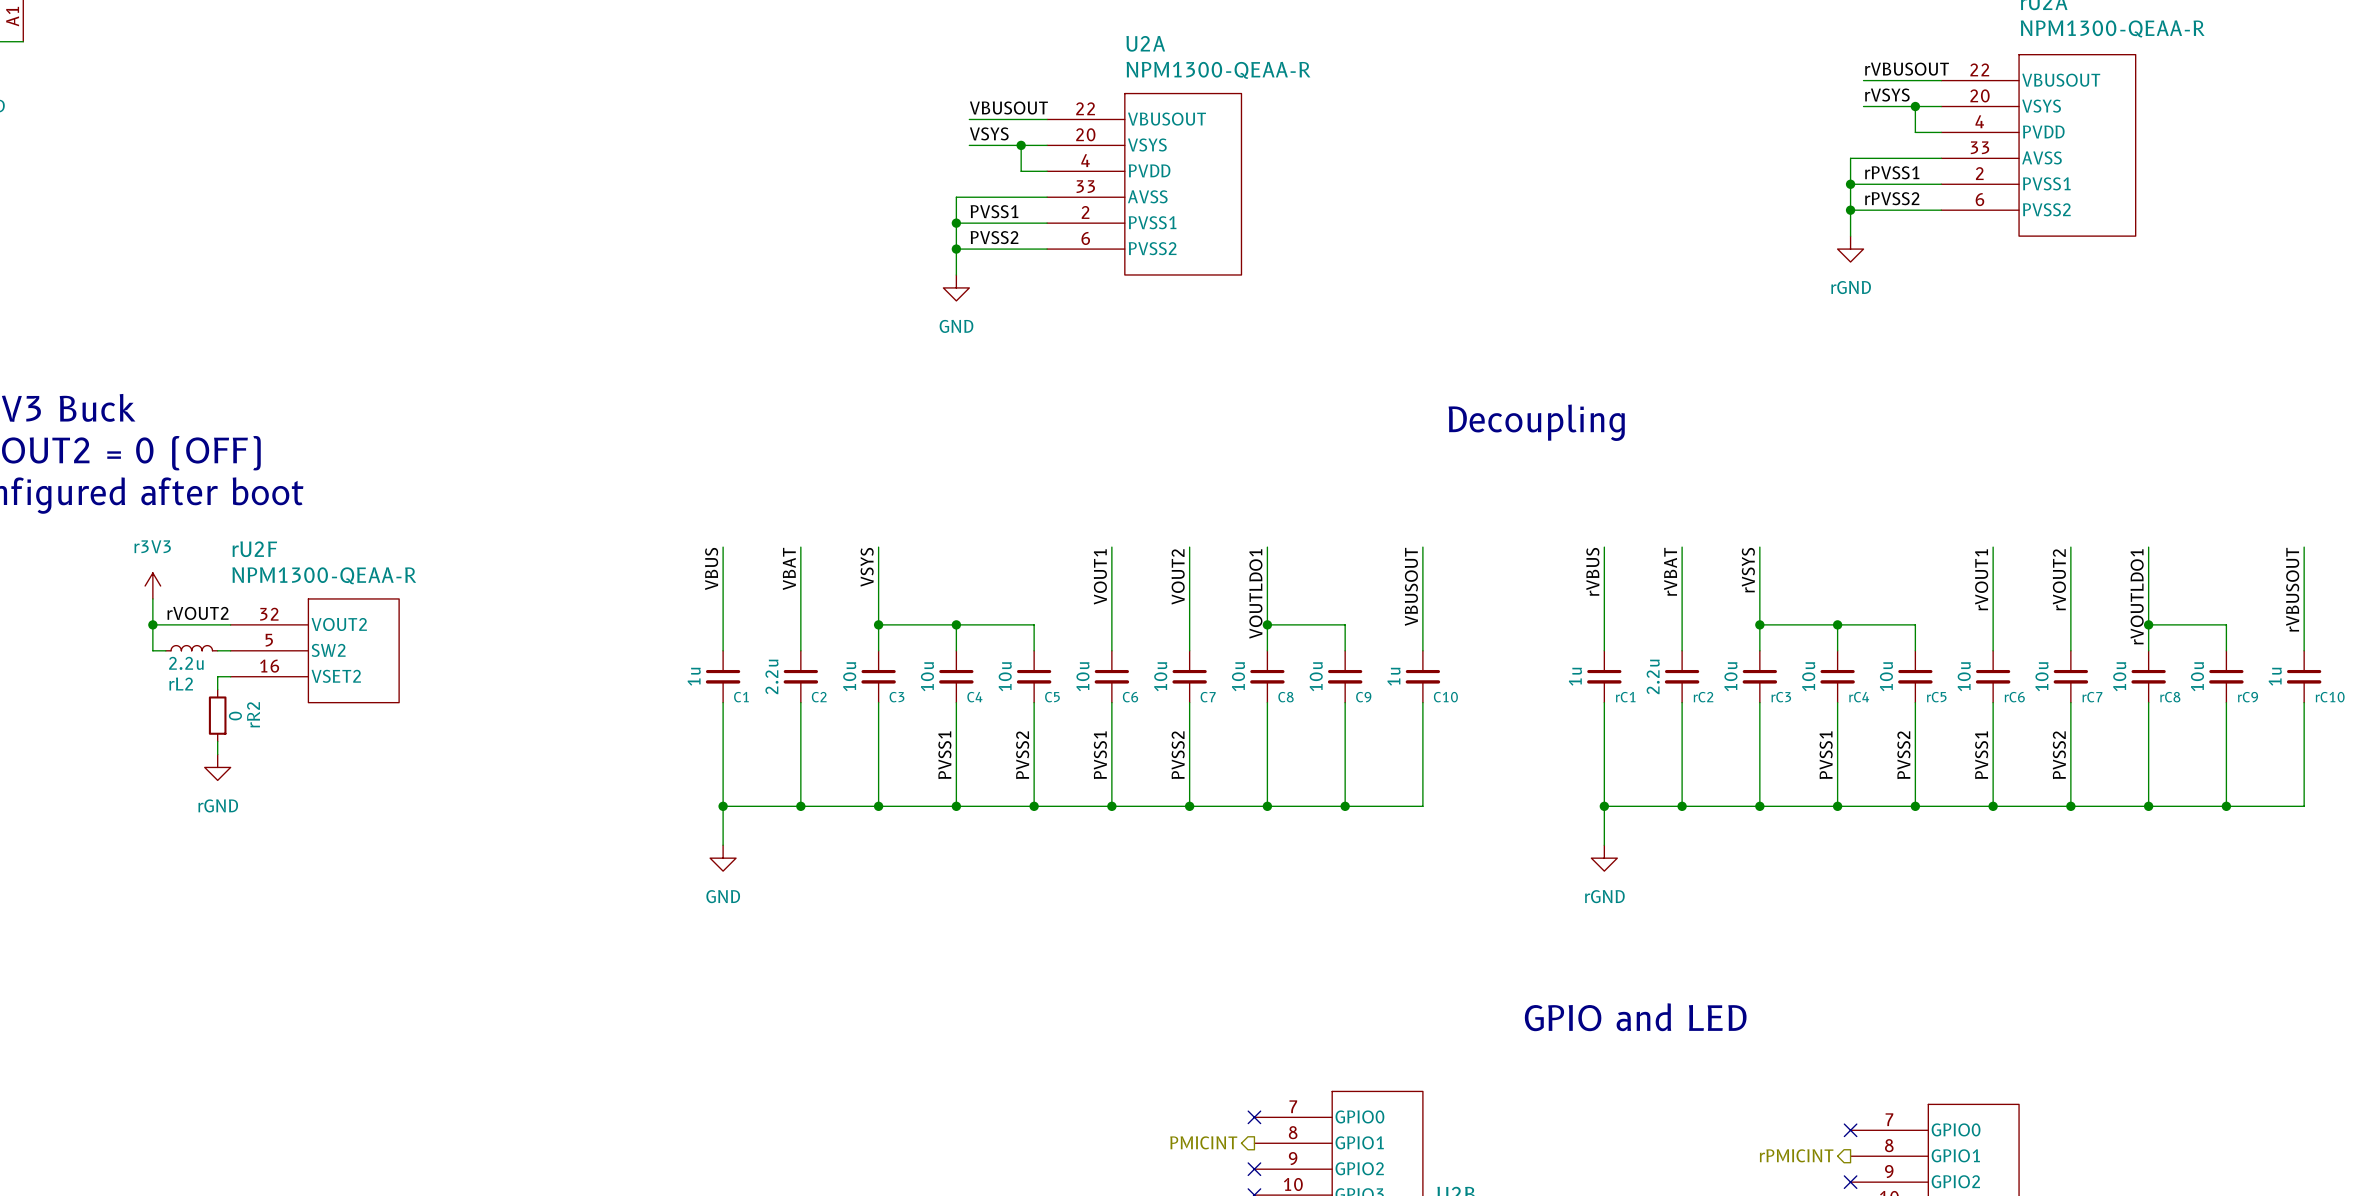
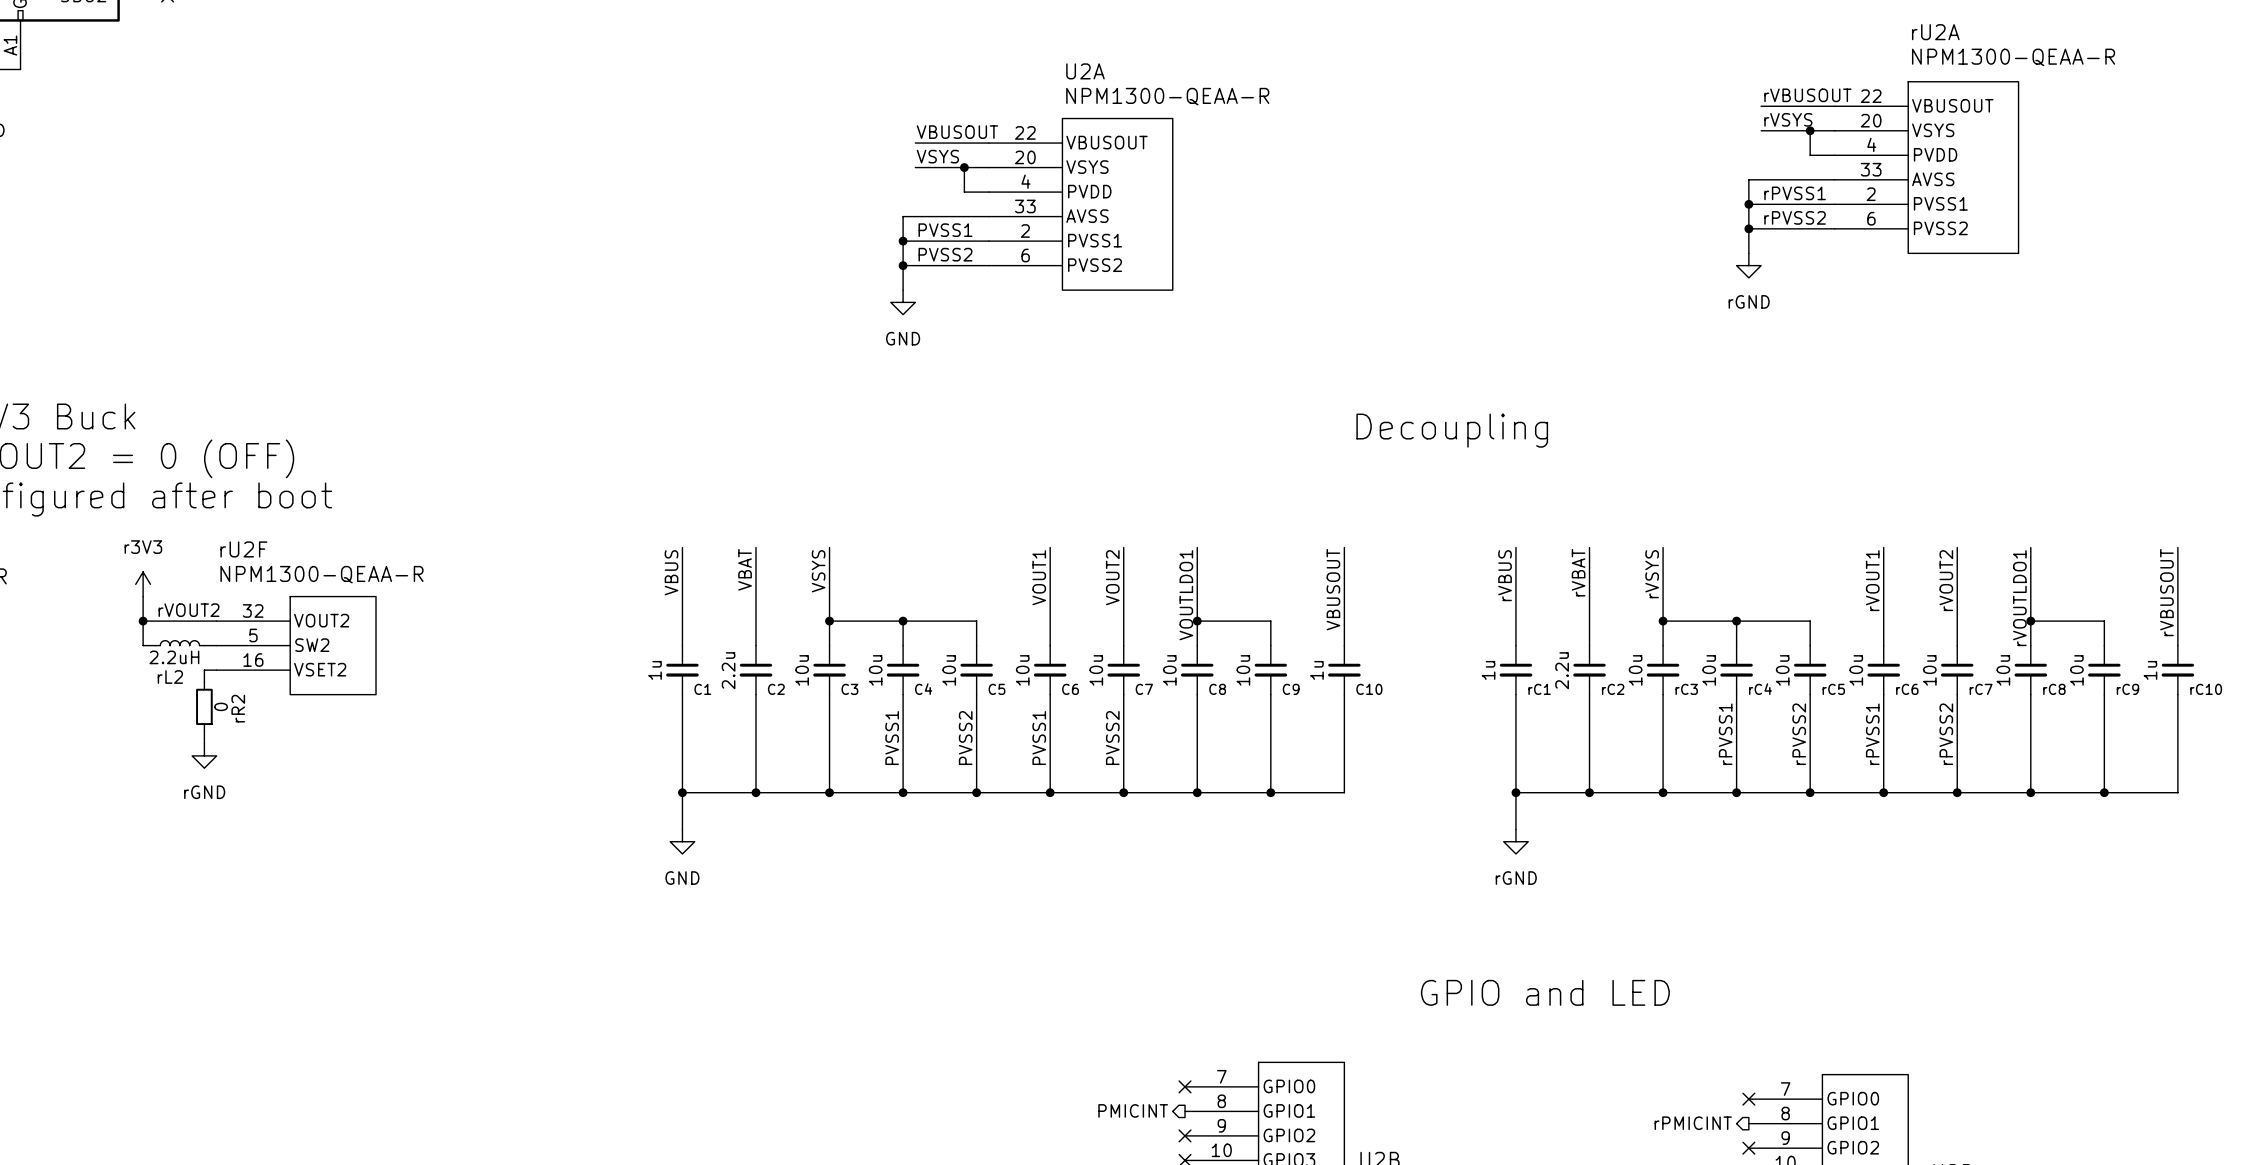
rL2 value: 2.2u (186, 663) -> 2.2uH (174, 657)
label: PVSS1 (1826, 755) -> rPVSS1 (1725, 734)
label: PVSS2 (1903, 755) -> rPVSS2 (1799, 734)
label: PVSS1 (1981, 755) -> rPVSS1 (1872, 734)
label: PVSS2 (2059, 755) -> rPVSS2 (1946, 734)

